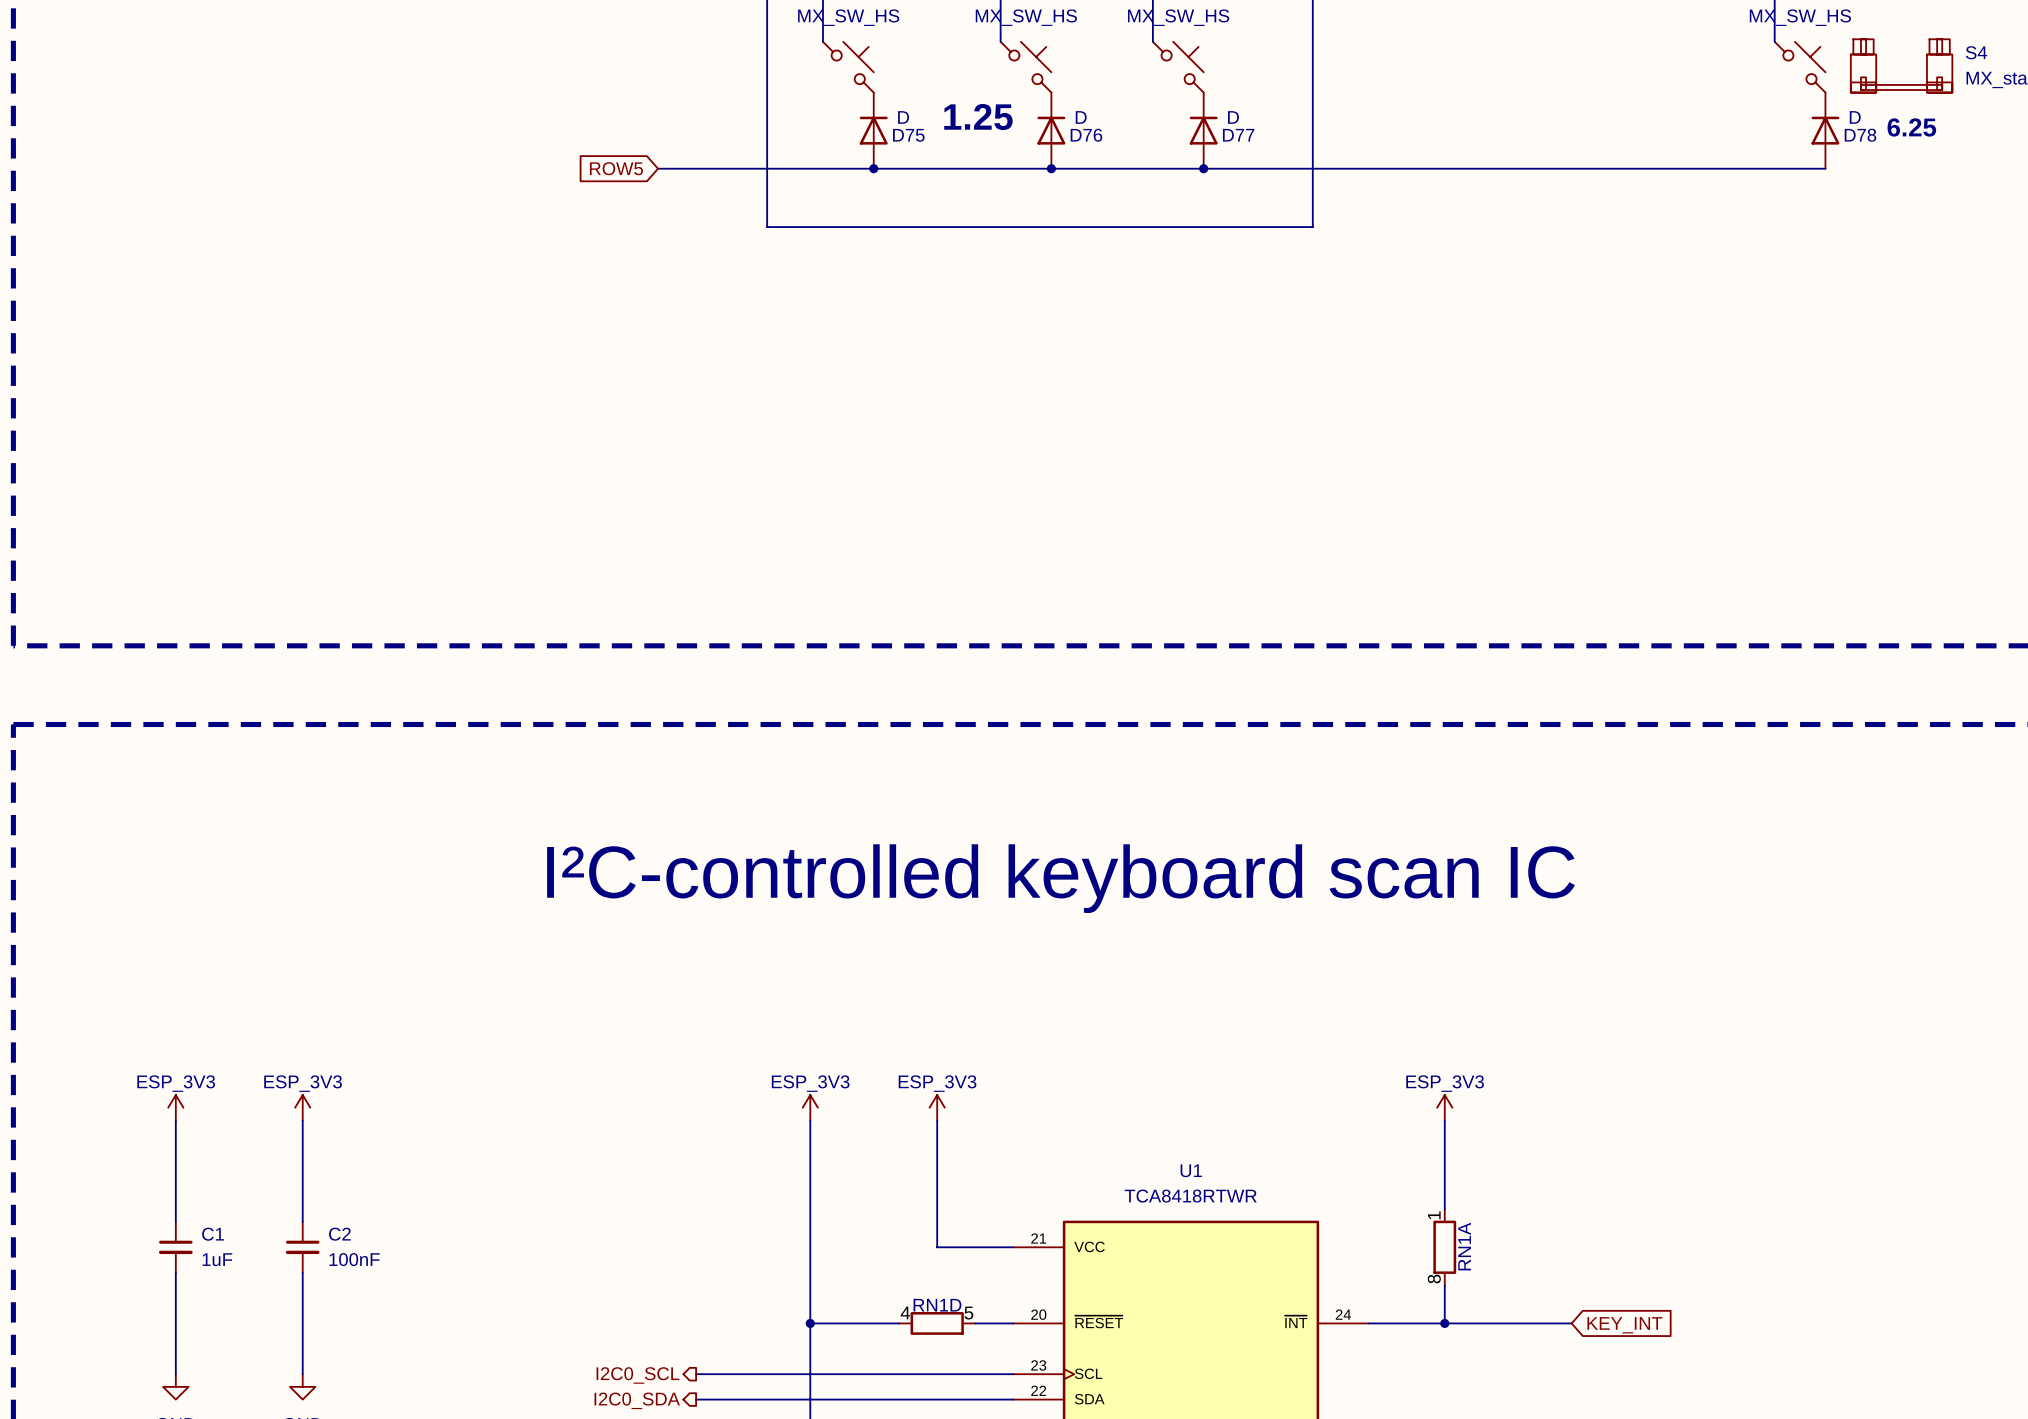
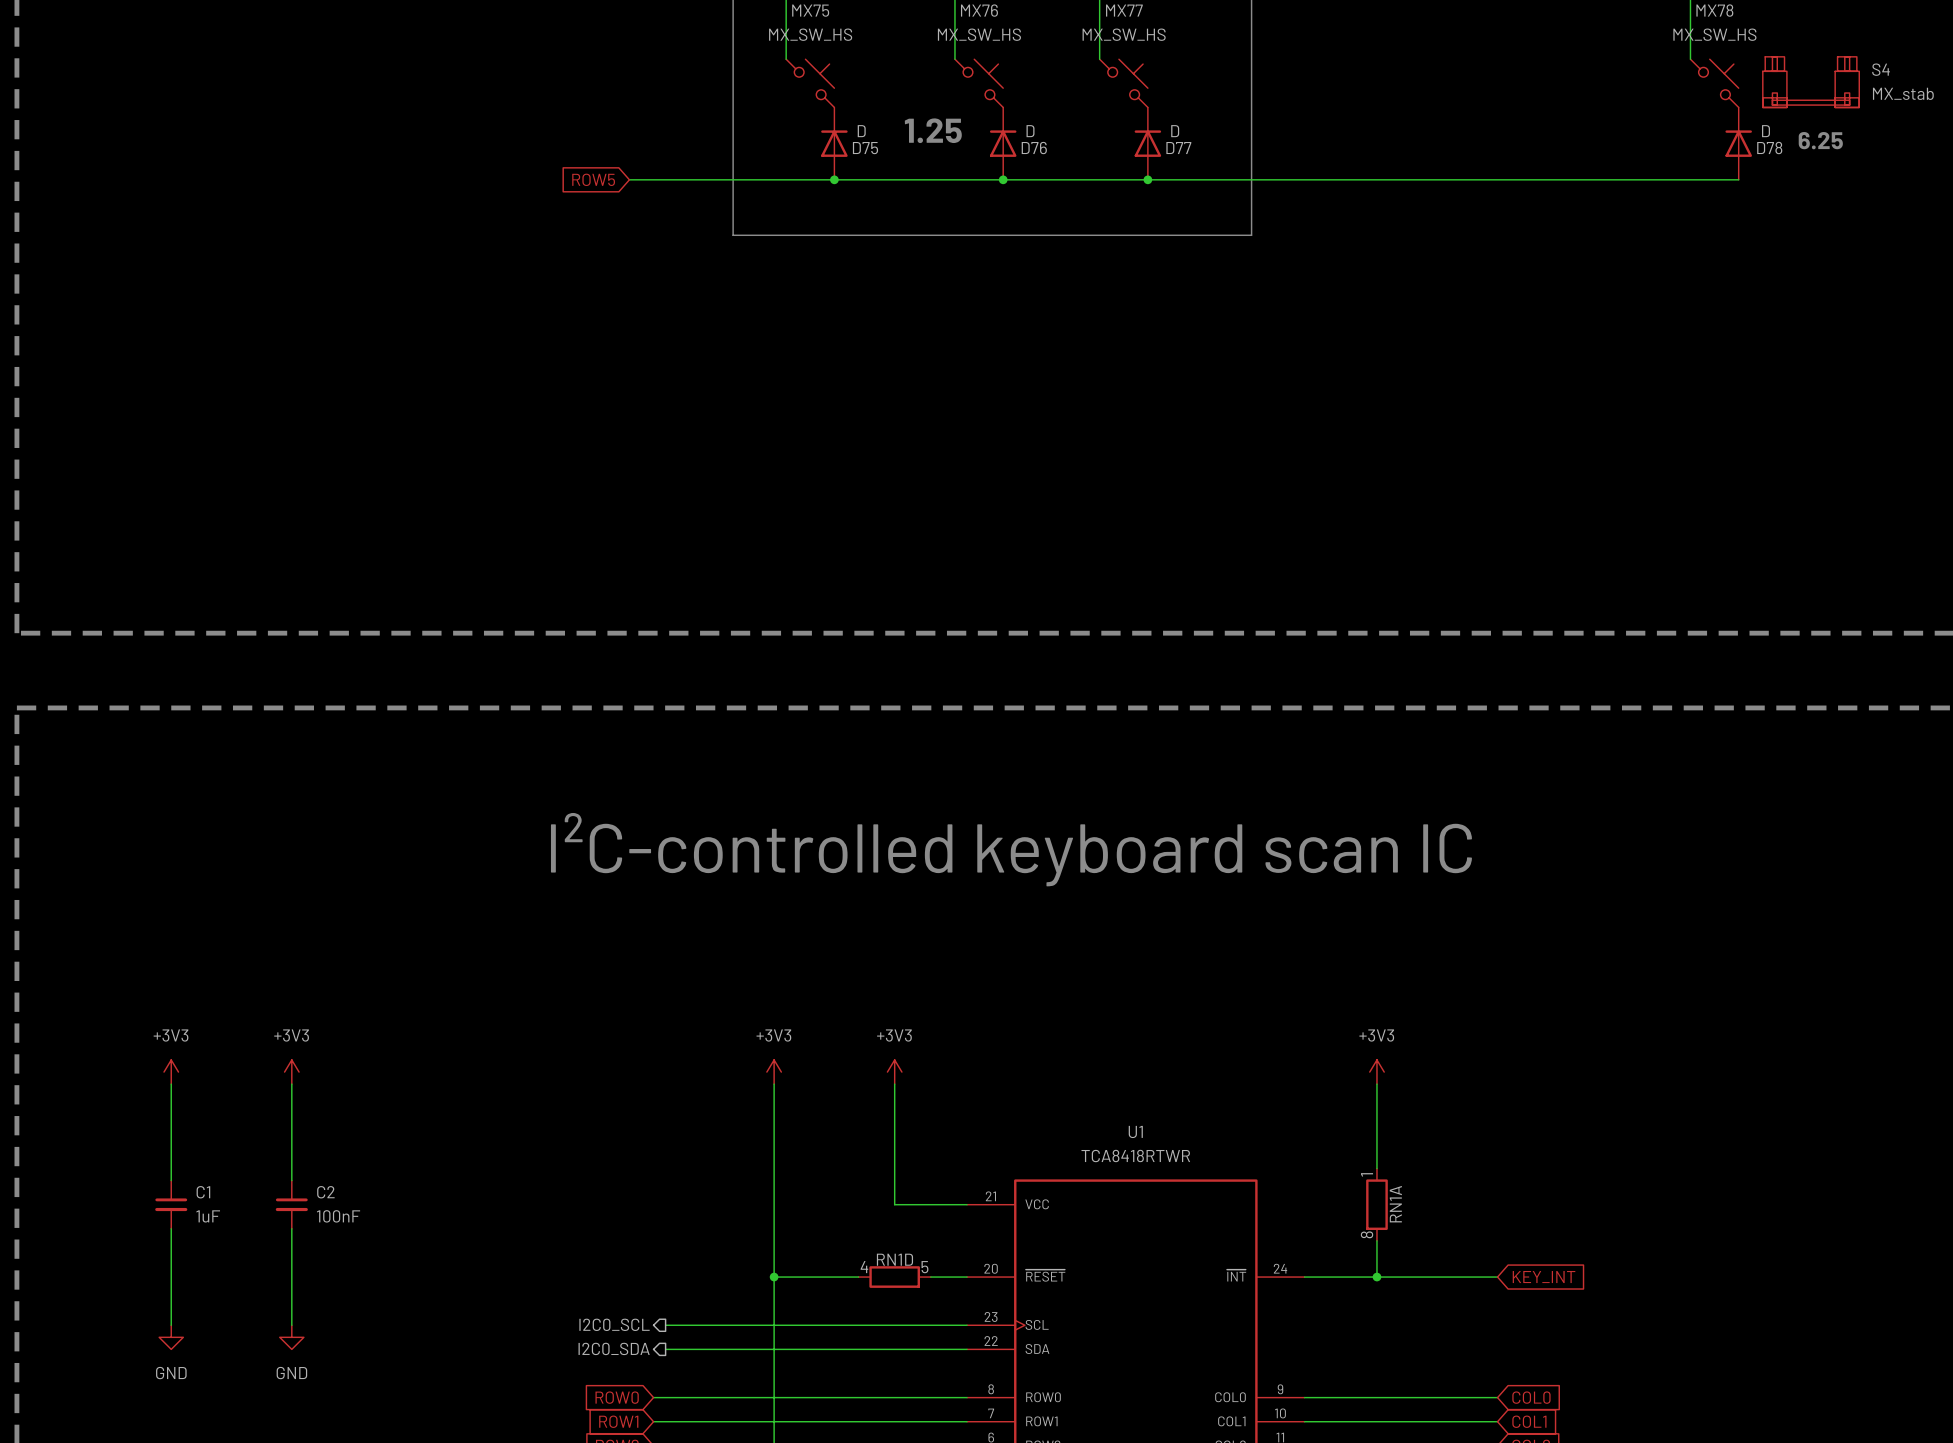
power symbol: ESP_3V3 (175, 1107) -> +3V3 (171, 1072)
power symbol: ESP_3V3 (302, 1107) -> +3V3 (291, 1072)
power symbol: ESP_3V3 (810, 1107) -> +3V3 (774, 1072)
power symbol: ESP_3V3 (937, 1107) -> +3V3 (894, 1072)
power symbol: ESP_3V3 (1444, 1107) -> +3V3 (1376, 1072)

